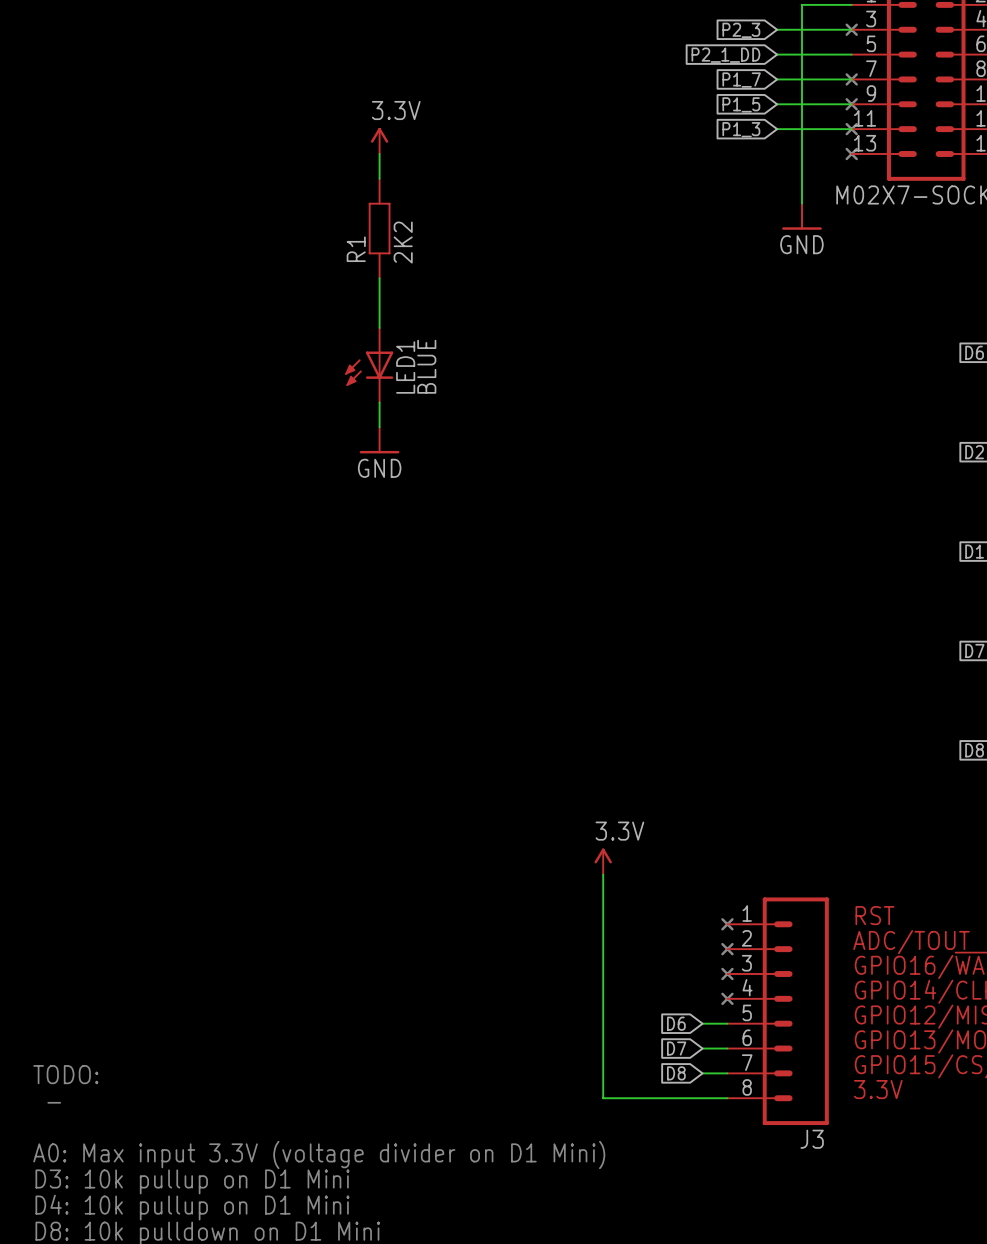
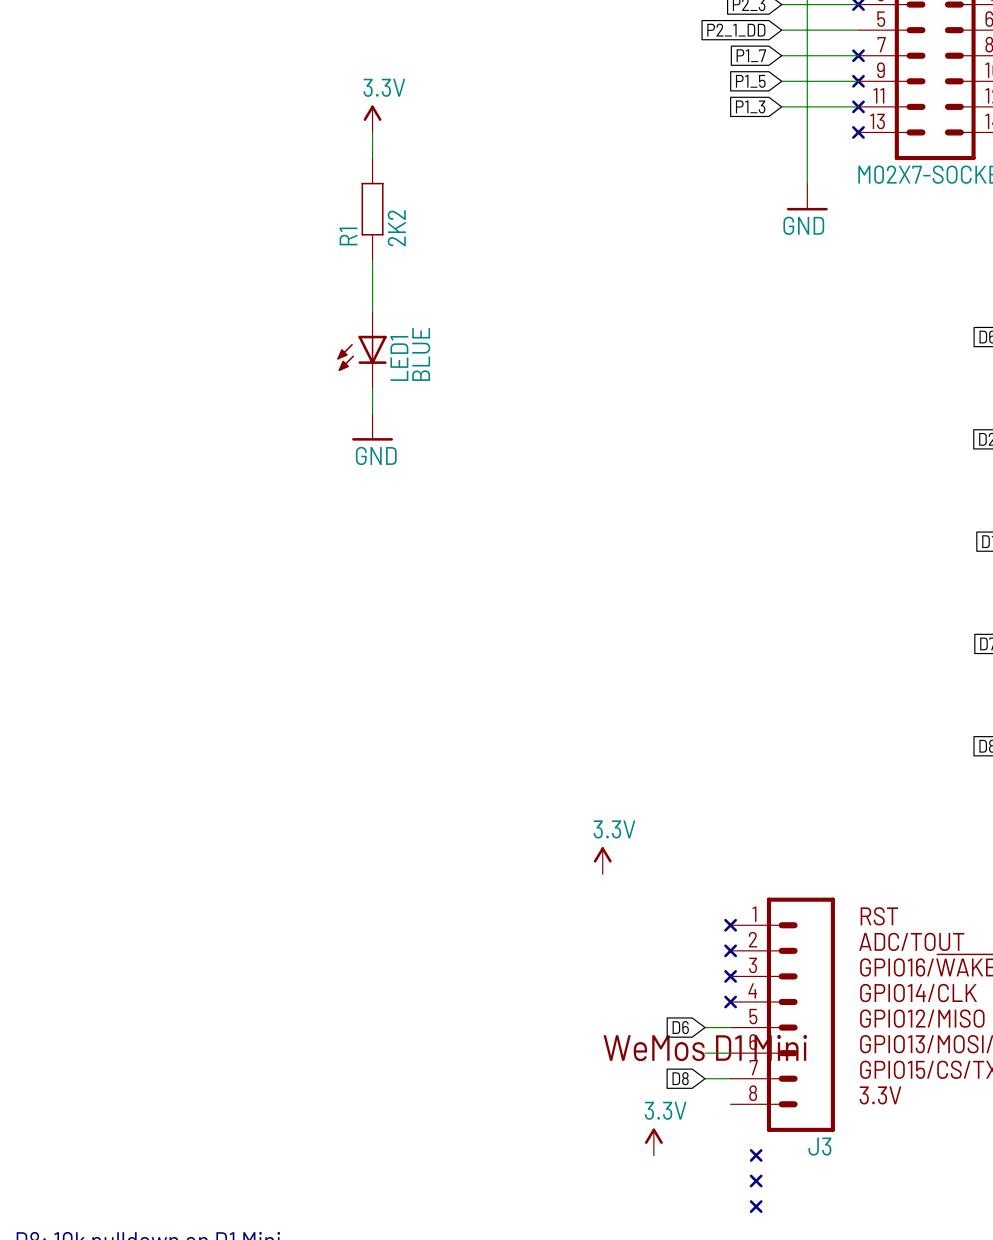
wire: (603, 874) (603, 1098) (727, 1098) -> none
text: none -> WeMos D1 Mini (705, 1048)
global label: D7 (676, 1048) -> none
text: TODO: (65, 1074) -> none
text: - (54, 1102) -> none
power symbol: none -> 3.3V (653, 1142)
part: none -> (756, 1155)
text: A0: Max input 3.3V (voltage divider on D1 Mini) (319, 1154) -> none
part: none -> (756, 1181)
text: D3: 10k pullup on D1 Mini (192, 1181) -> none
part: none -> (756, 1206)
text: D4: 10k pullup on D1 Mini (192, 1207) -> none

